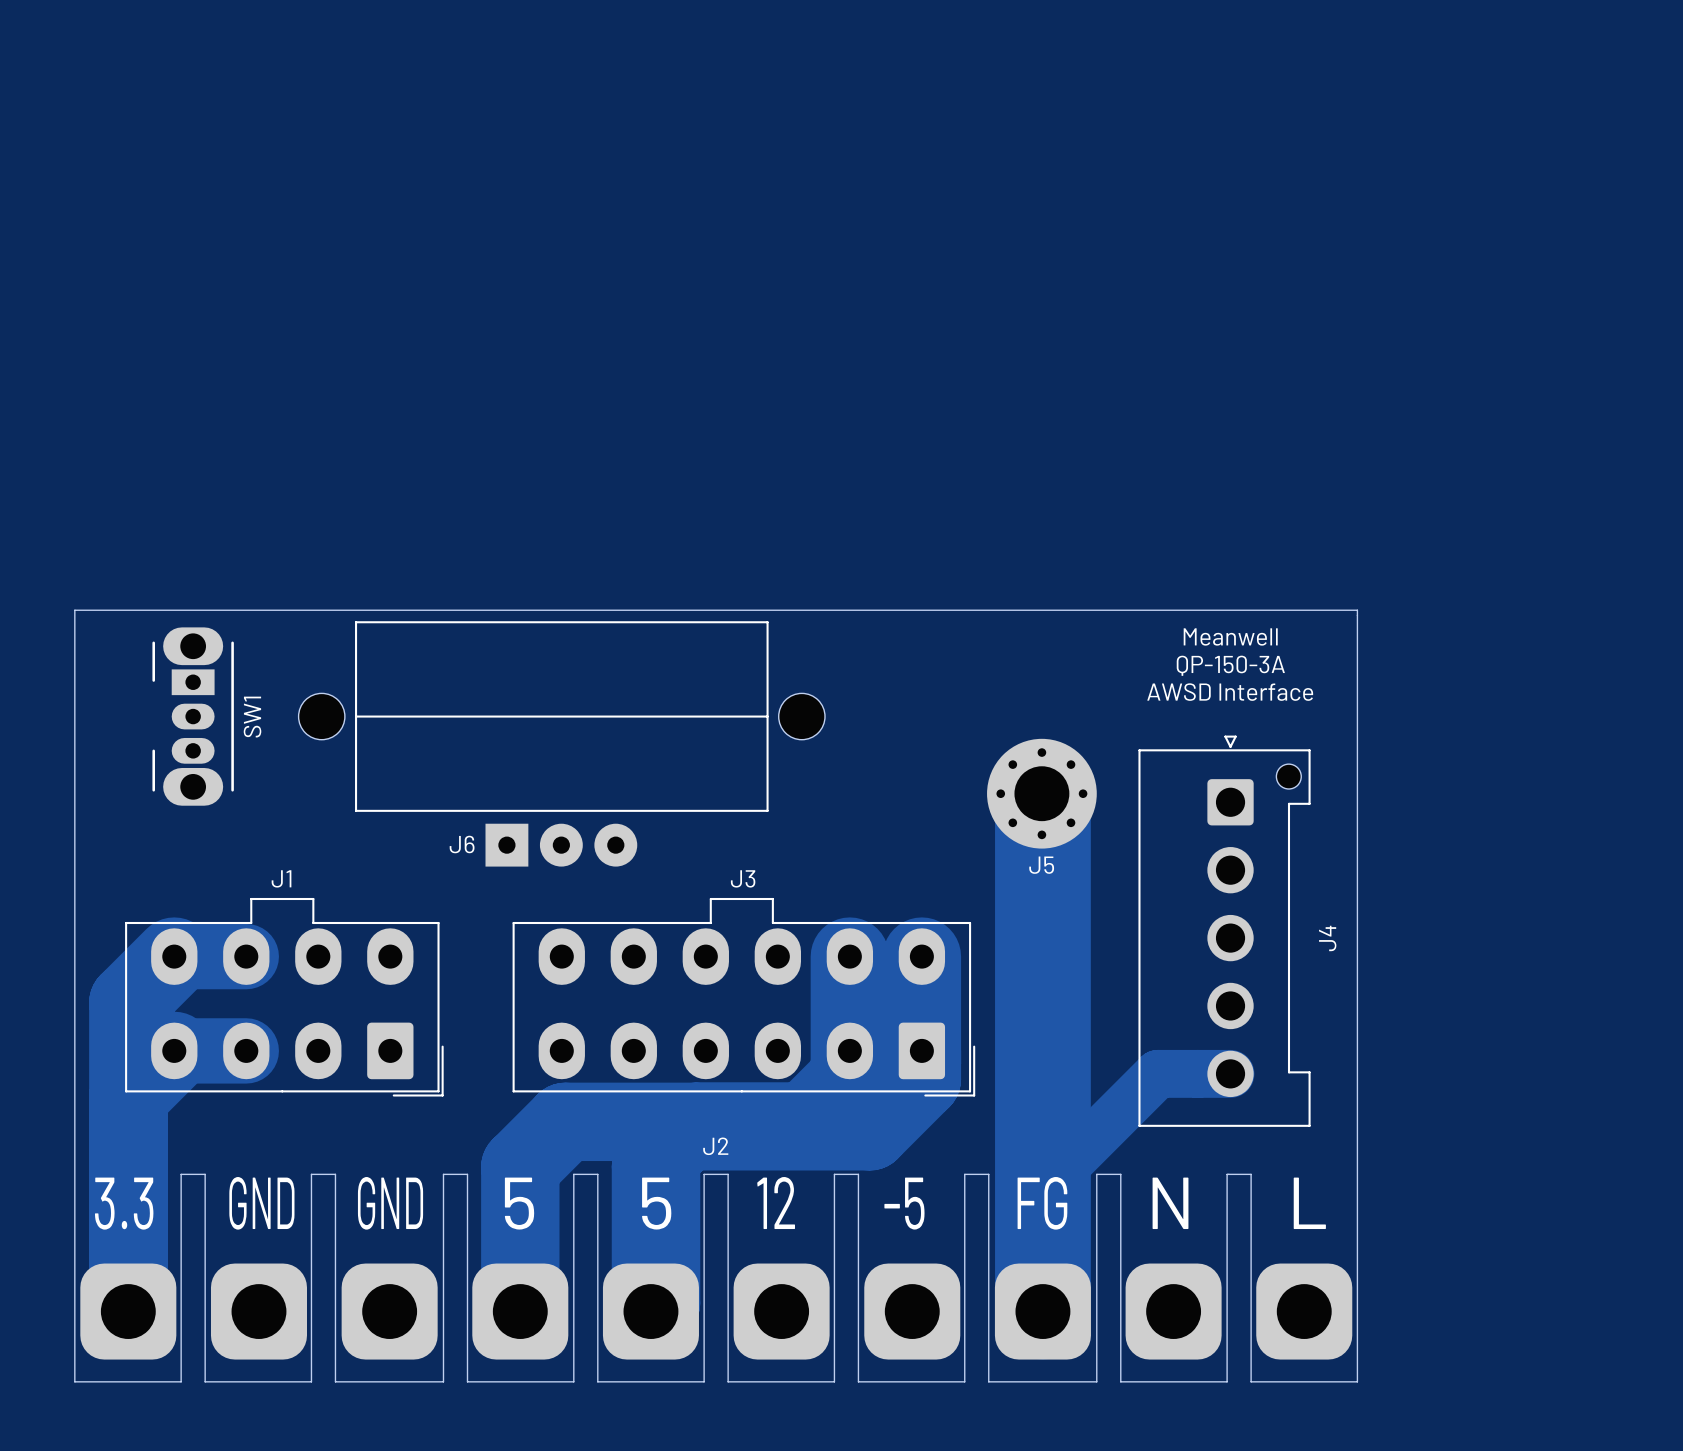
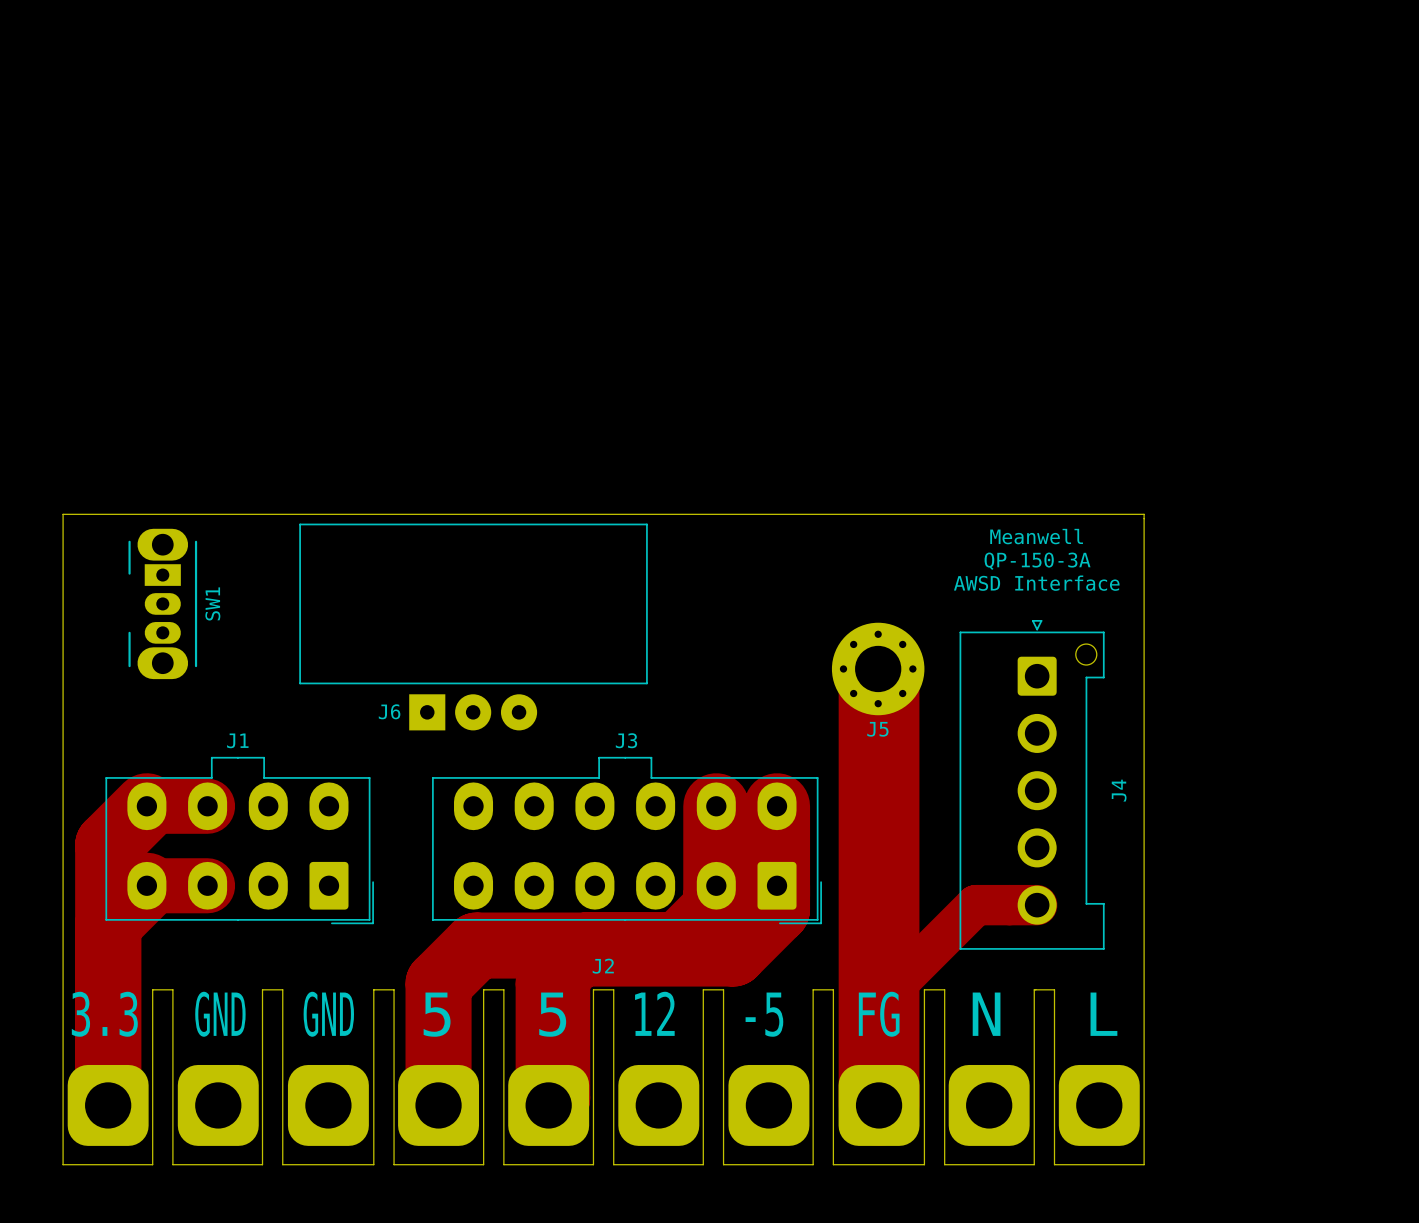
part: (321, 716) -> none
line: (356, 716) (767, 716) -> none
part: (801, 716) -> none

